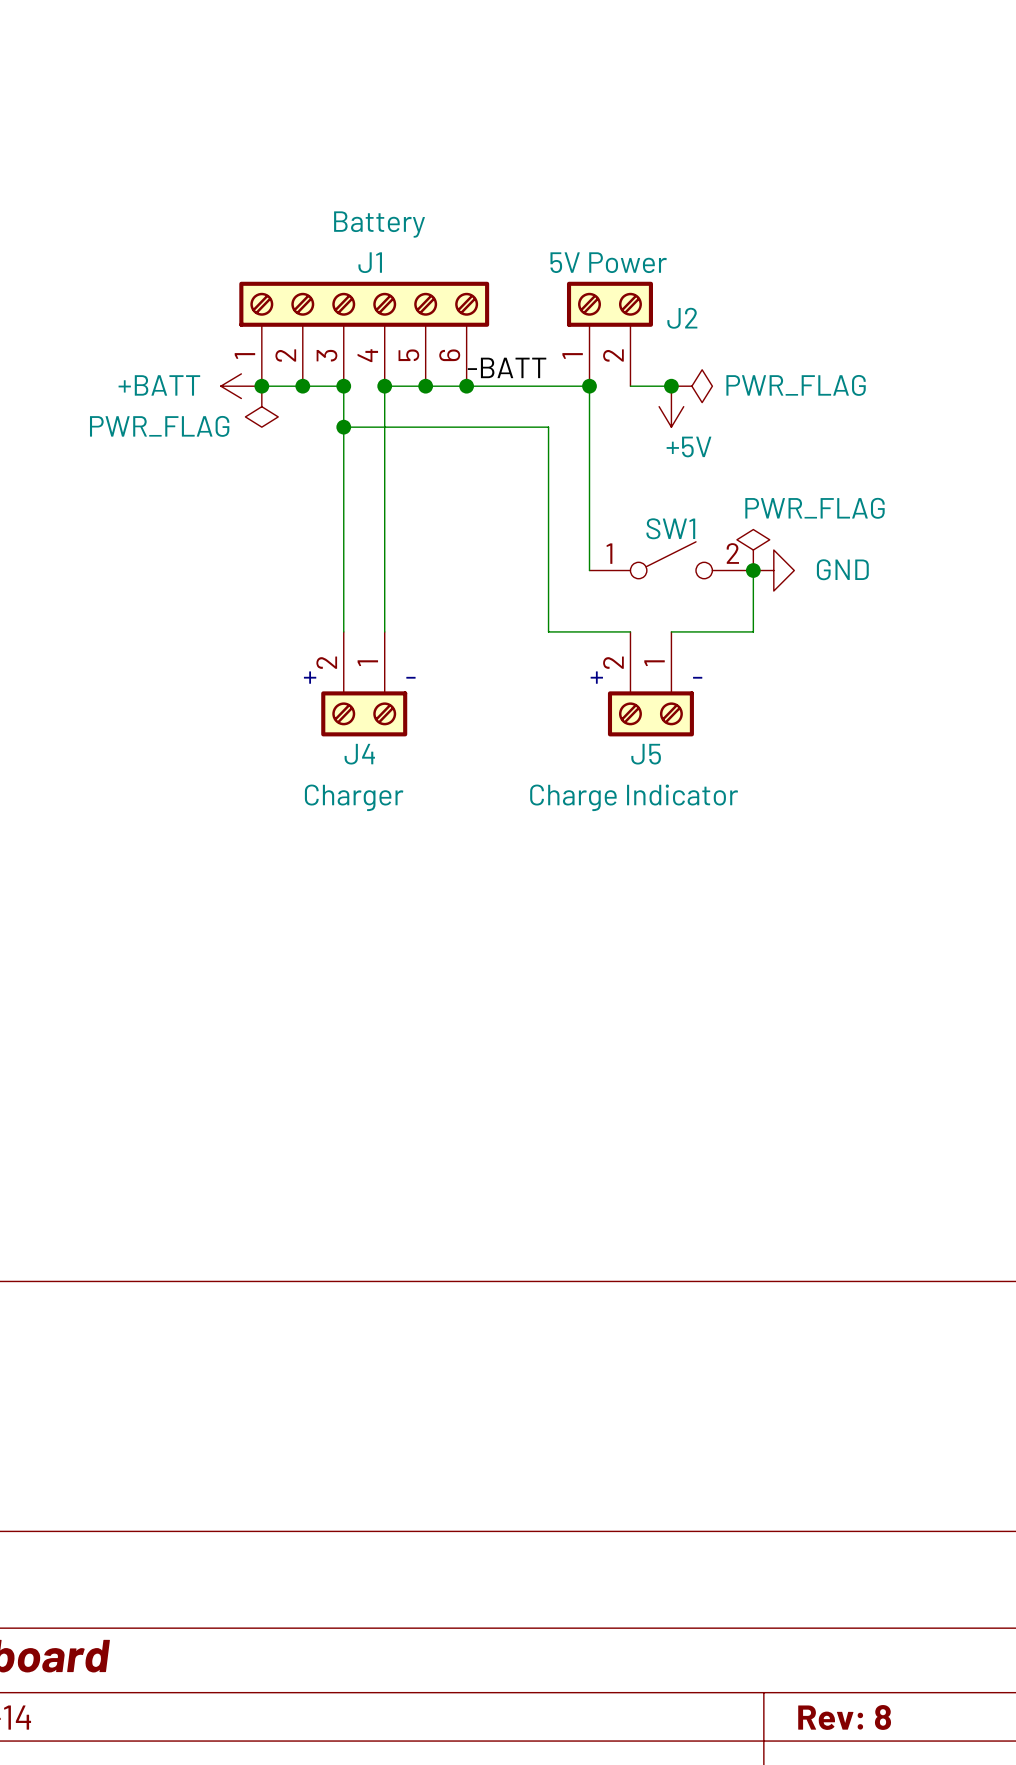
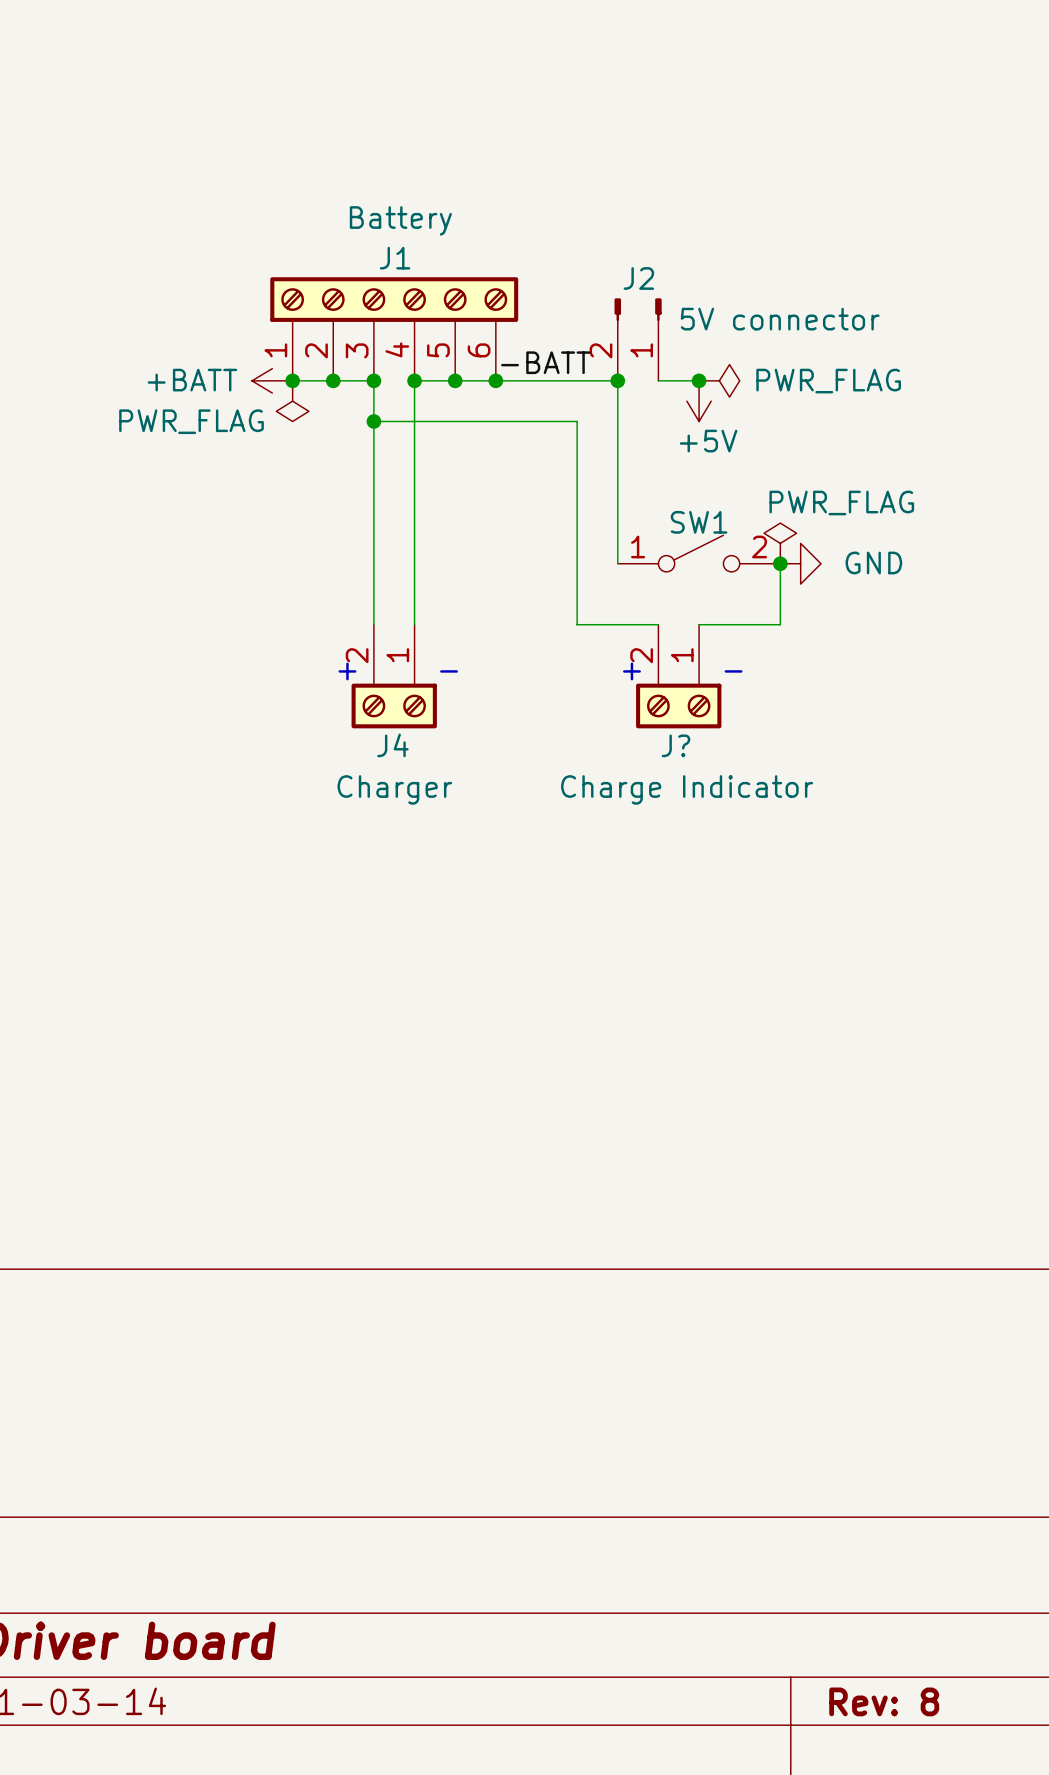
J2 value: 5V Power (608, 262) -> 5V connector (780, 319)
J2 symbol: [566, 281, 653, 387] -> [614, 298, 662, 381]
J2 name position: J2 (682, 318) -> J2 (638, 278)
J5 name: J5 (646, 754) -> J? (675, 745)

